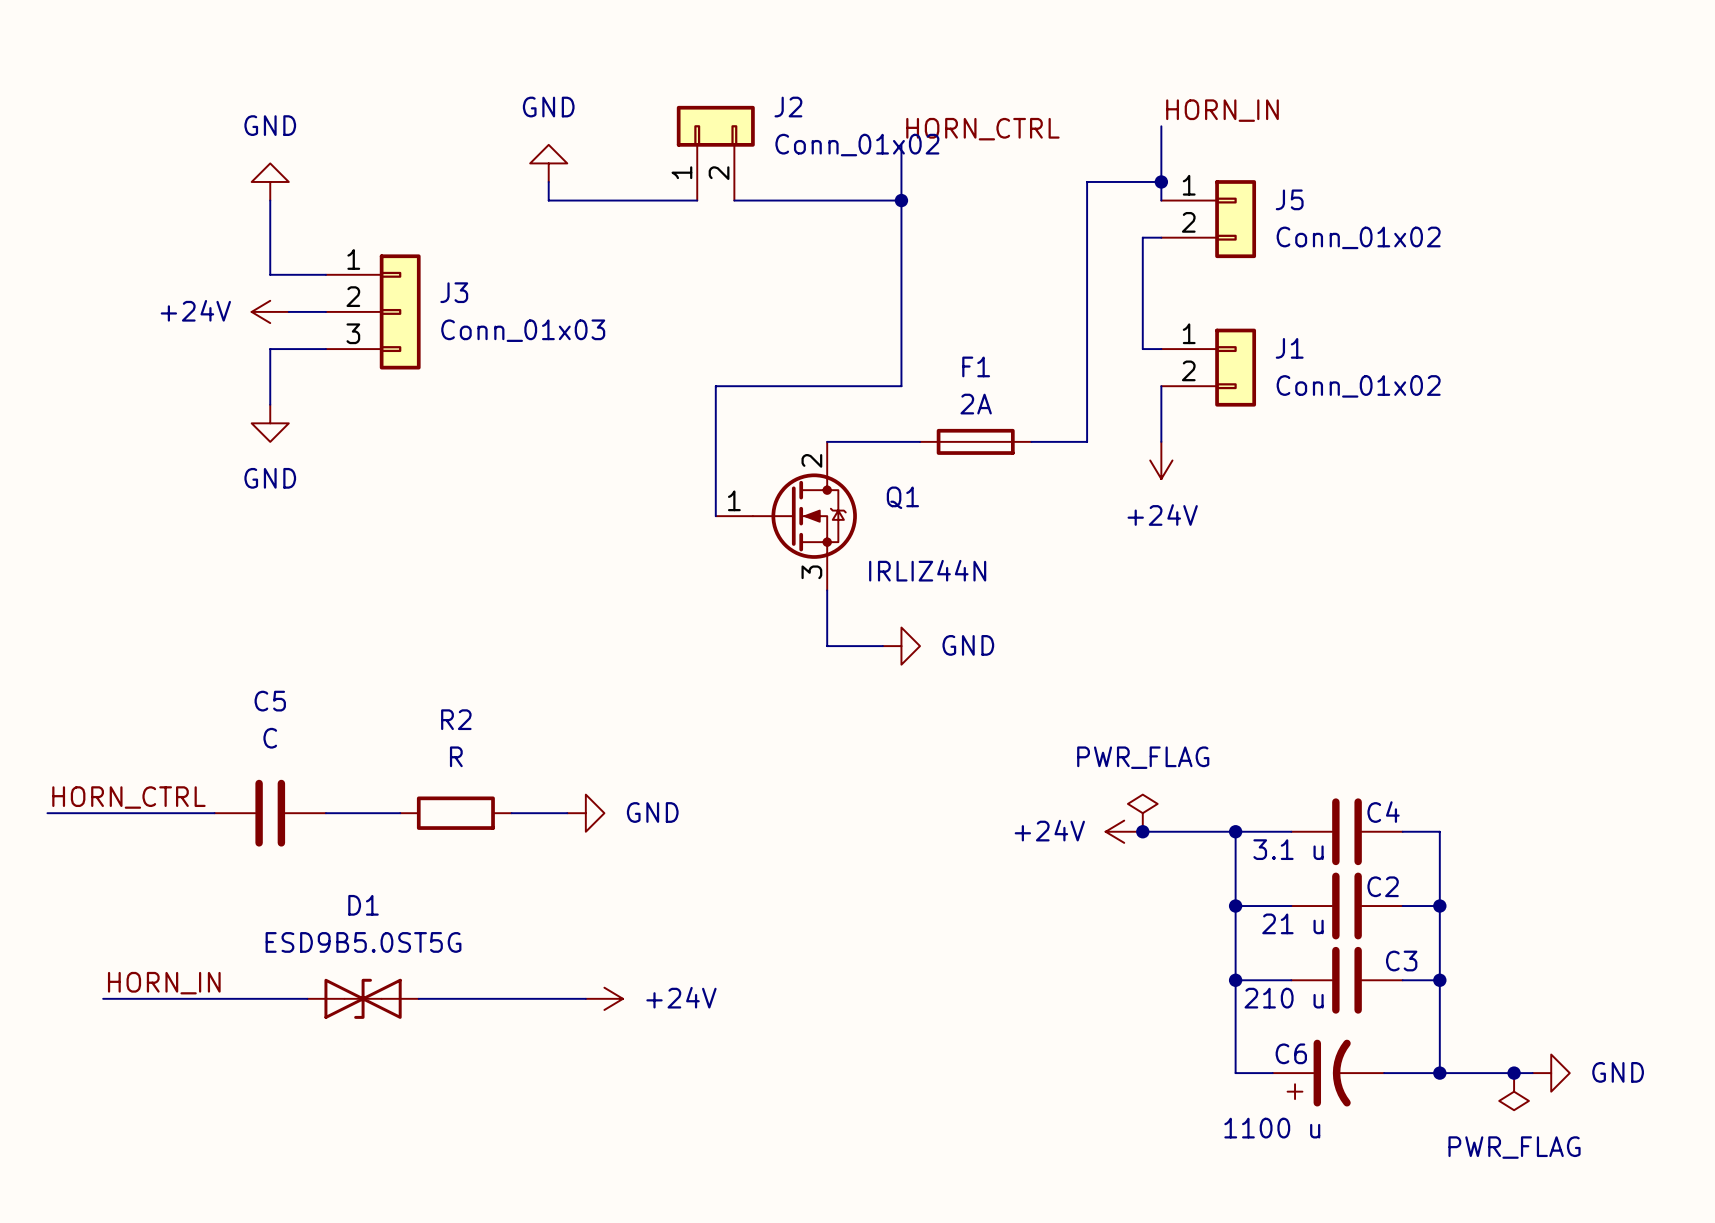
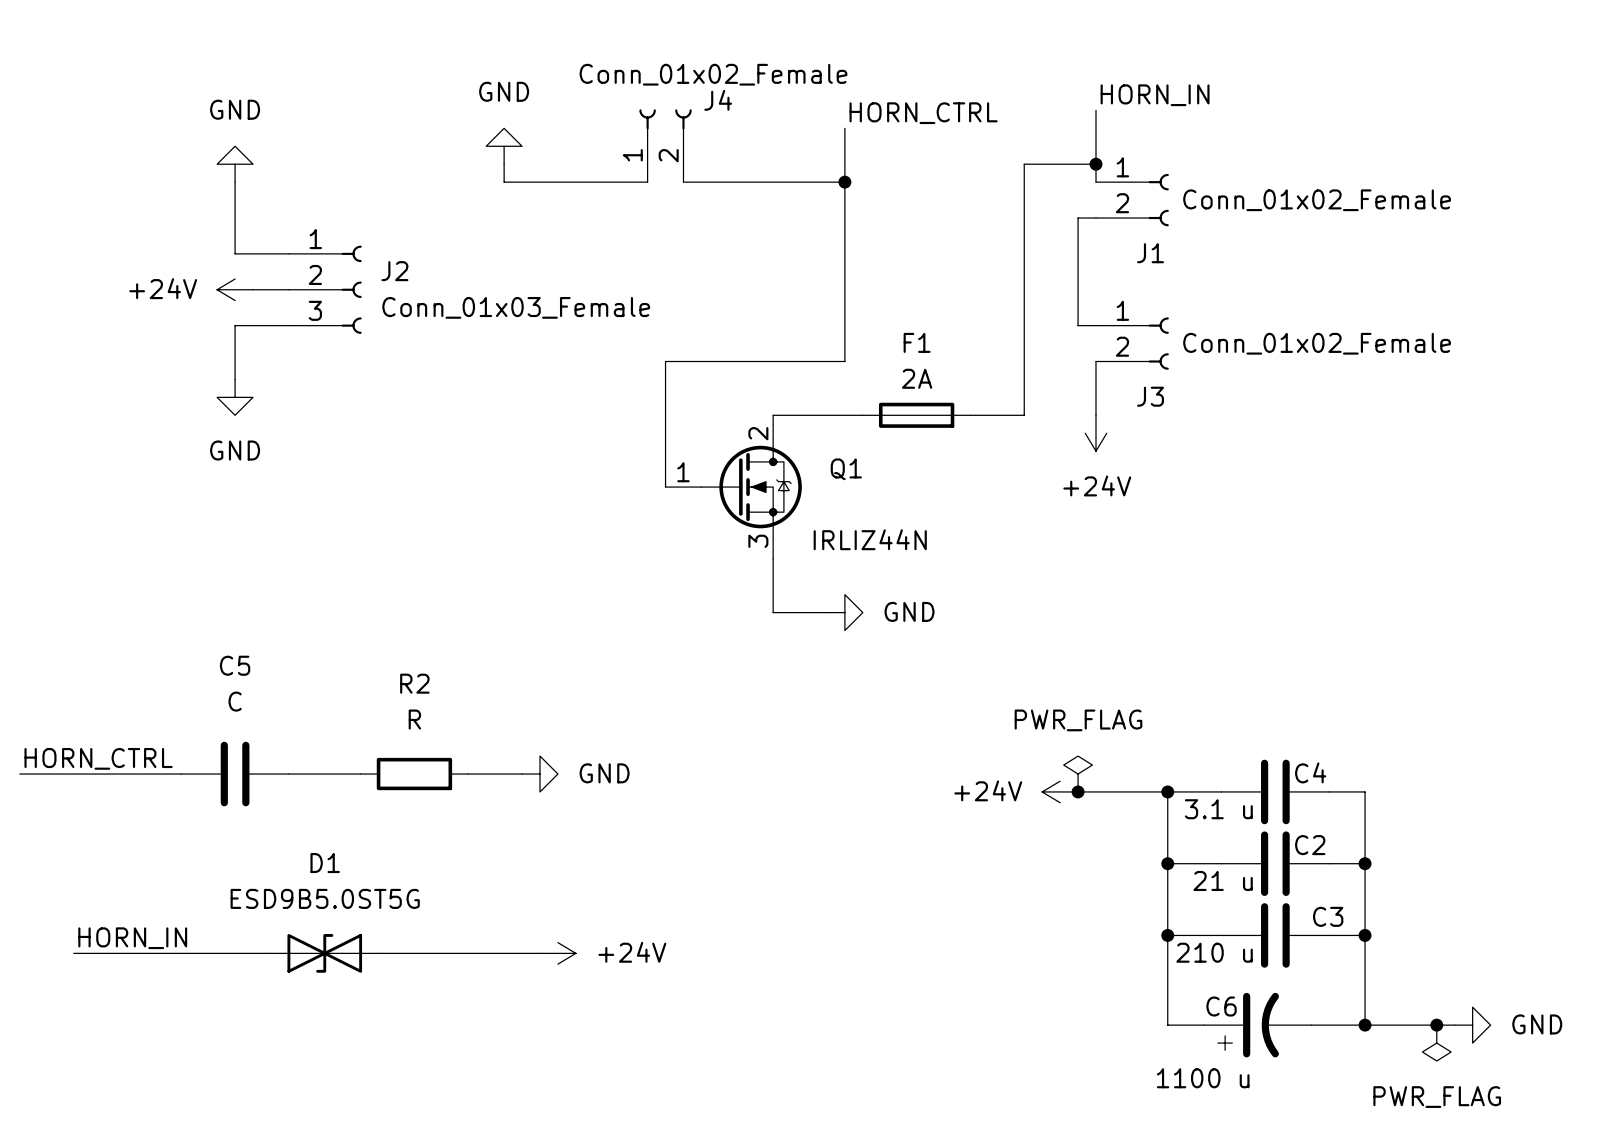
J2 symbol: [676, 105, 755, 201] -> [288, 245, 362, 334]
J2 value: Conn_01x02 (857, 145) -> Conn_01x03_Female (516, 307)
J4: none -> Conn_01x02_Female (665, 145)
J5: Conn_01x02 (1208, 219) -> none
J3 symbol: [325, 254, 421, 370] -> [1096, 317, 1169, 370]
J3 name position: J3 (454, 292) -> J3 (1150, 396)
J1 symbol: [1161, 328, 1257, 407] -> [1096, 173, 1169, 227]
J3 value: Conn_01x03 (523, 330) -> Conn_01x02_Female (1317, 343)
J1 name position: J1 (1289, 348) -> J1 (1150, 253)
J1 value: Conn_01x02 (1358, 386) -> Conn_01x02_Female (1317, 200)

